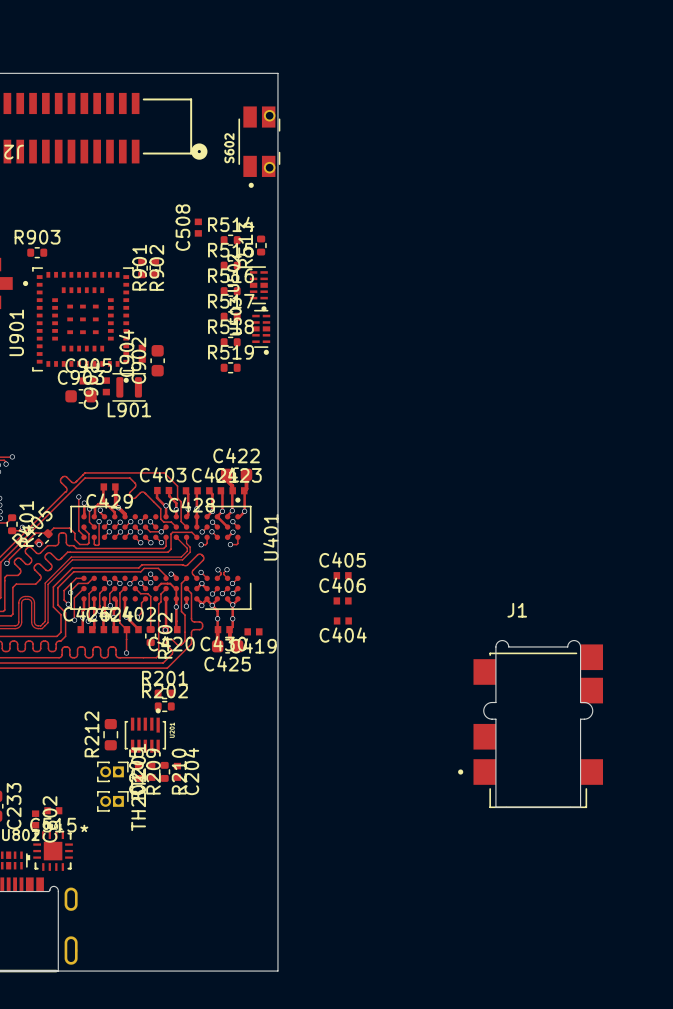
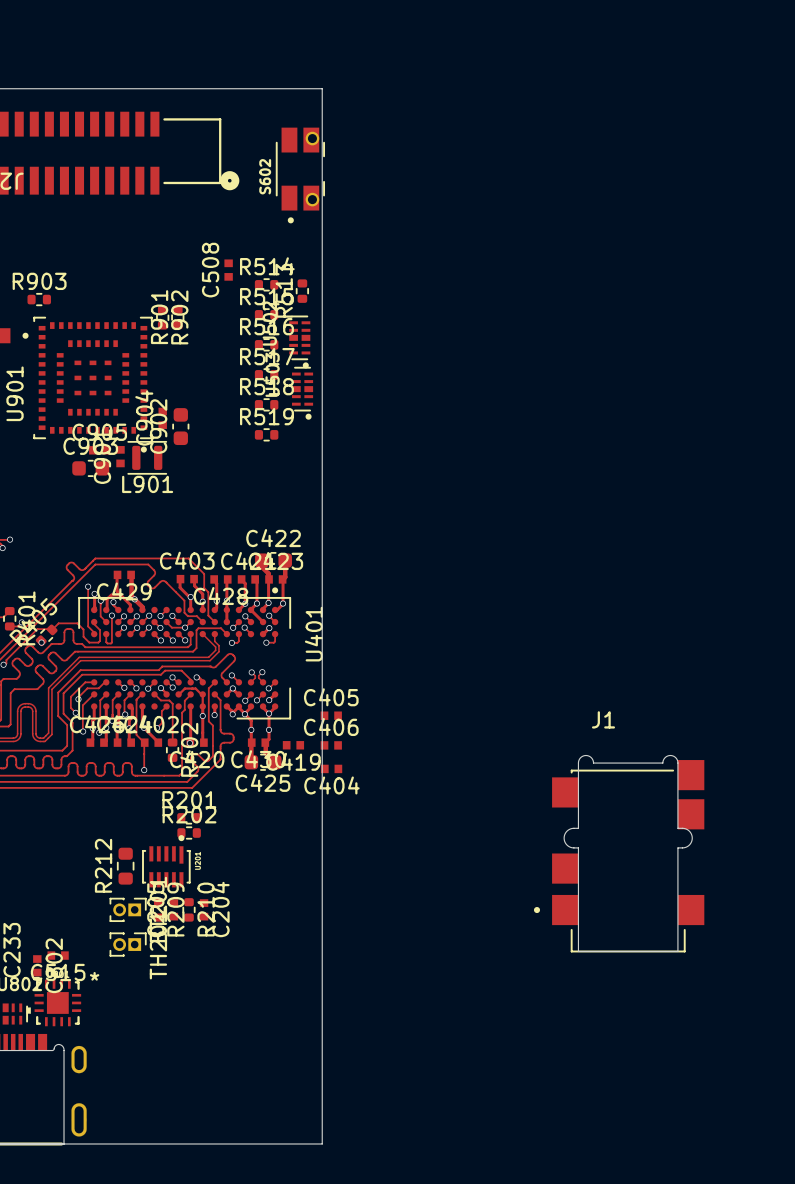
C405 position: (342, 575) -> (331, 715)
C406 position: (342, 600) -> (331, 745)
C404 position: (342, 620) -> (331, 768)

